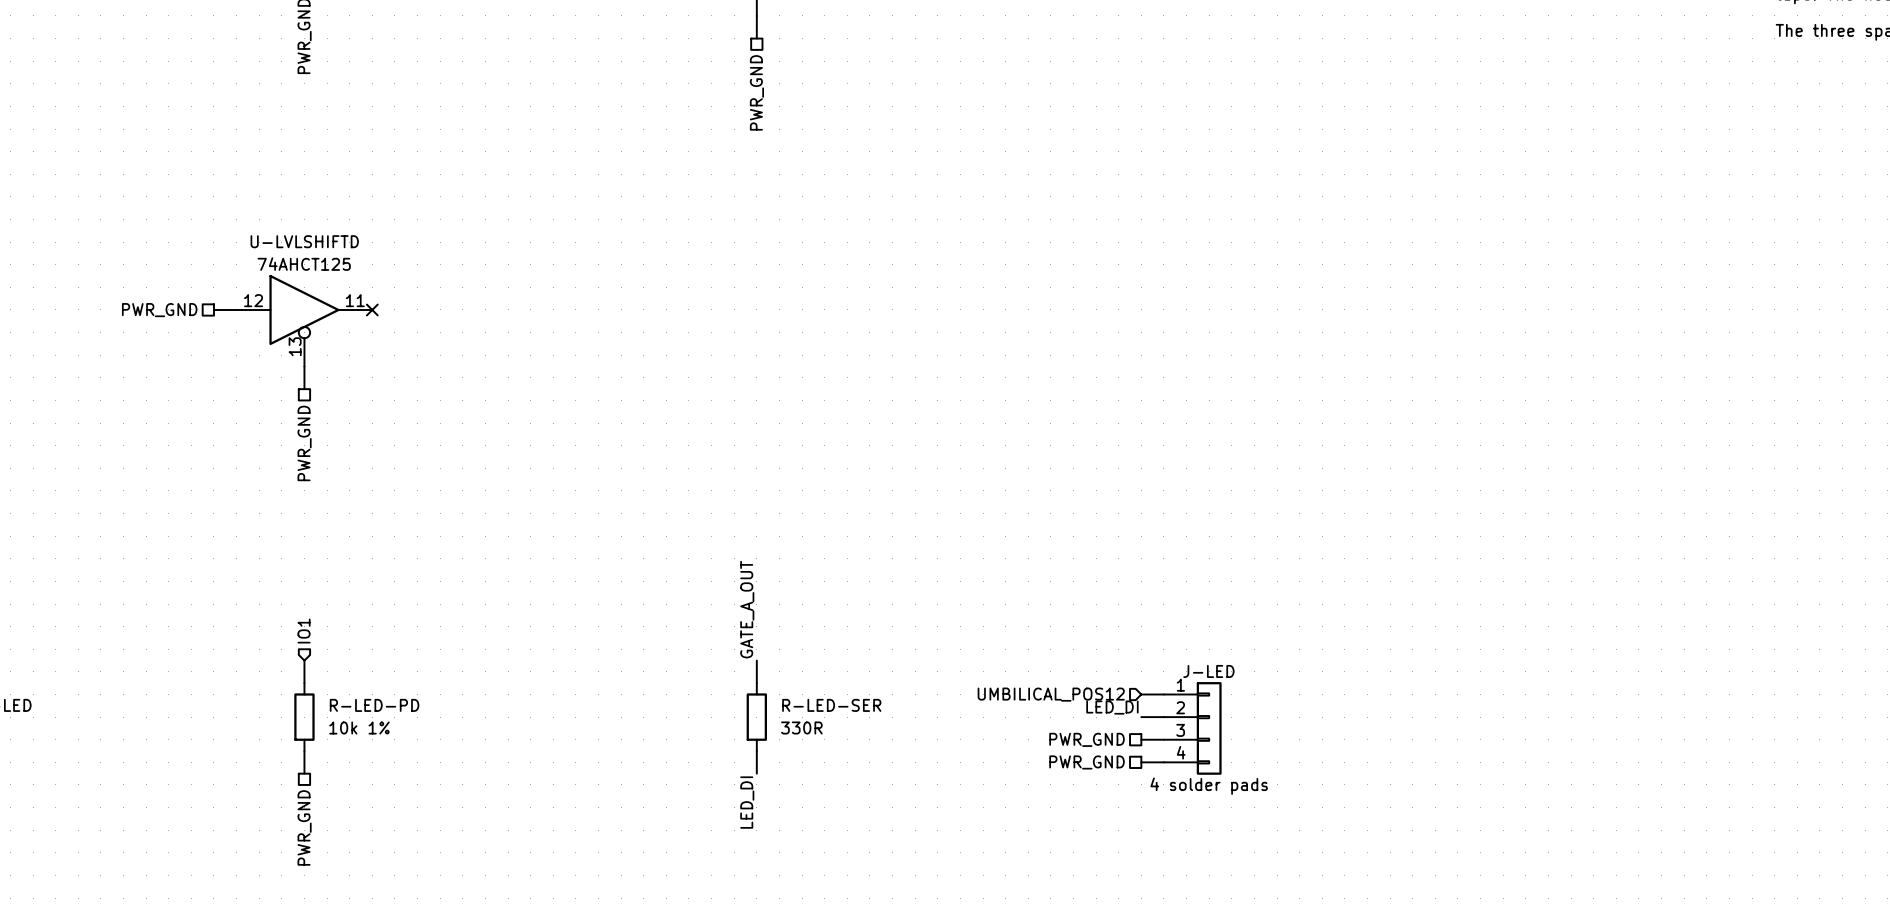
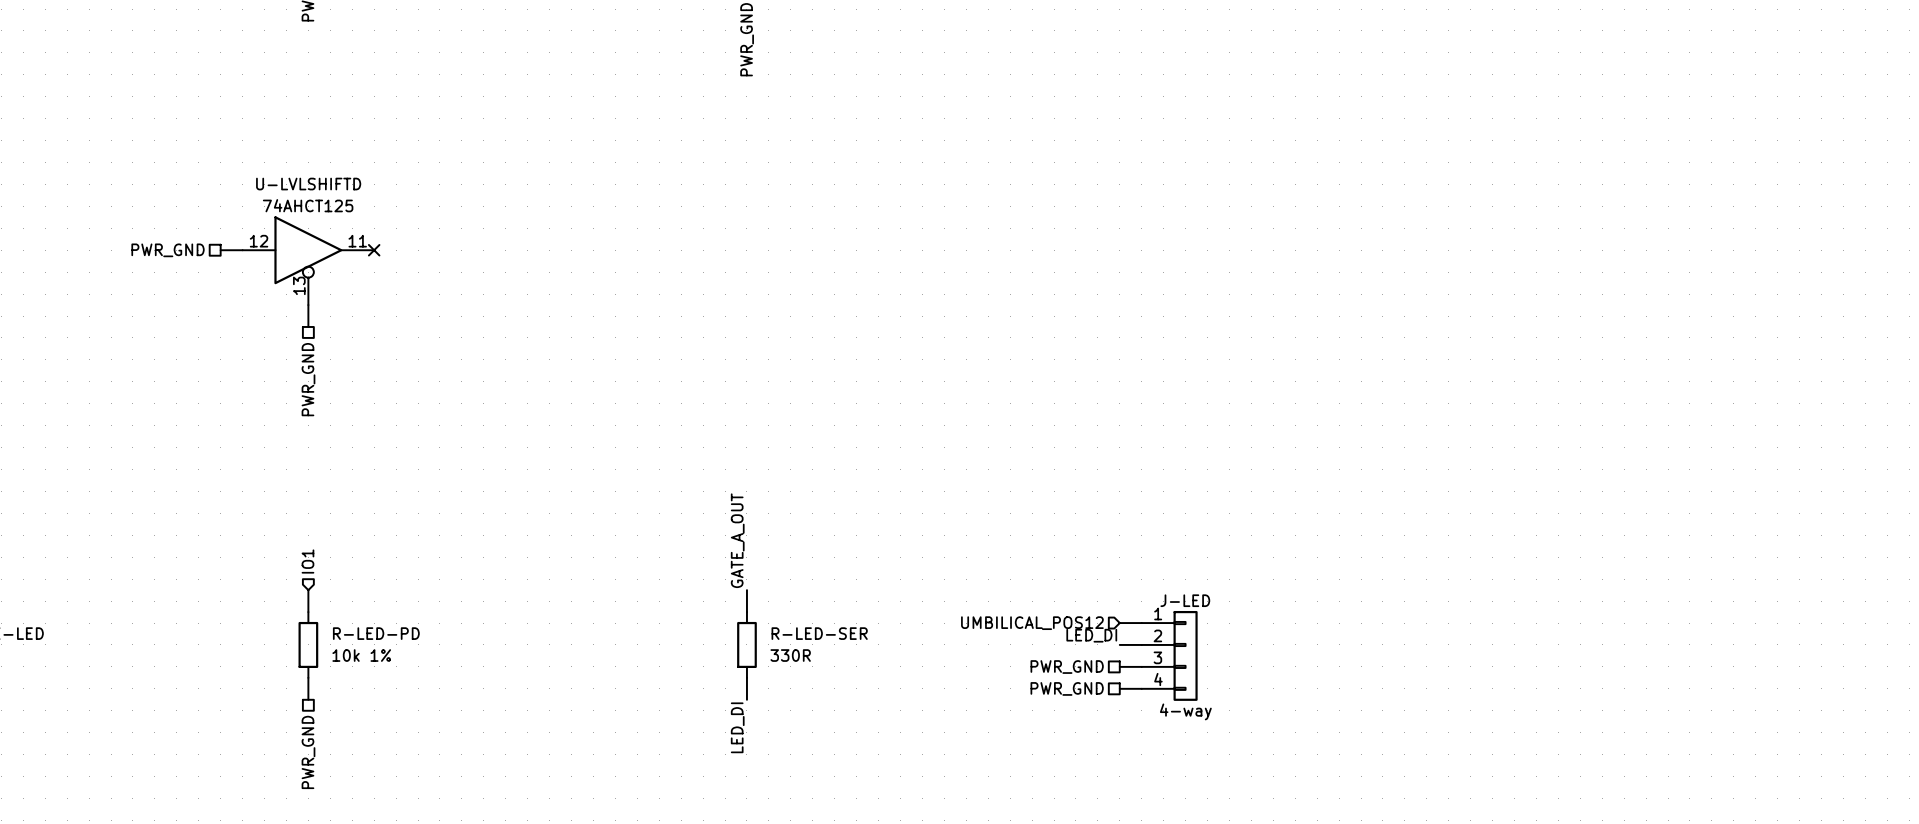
J-LED value: 4 solder pads (1209, 786) -> 4-way (1185, 711)

